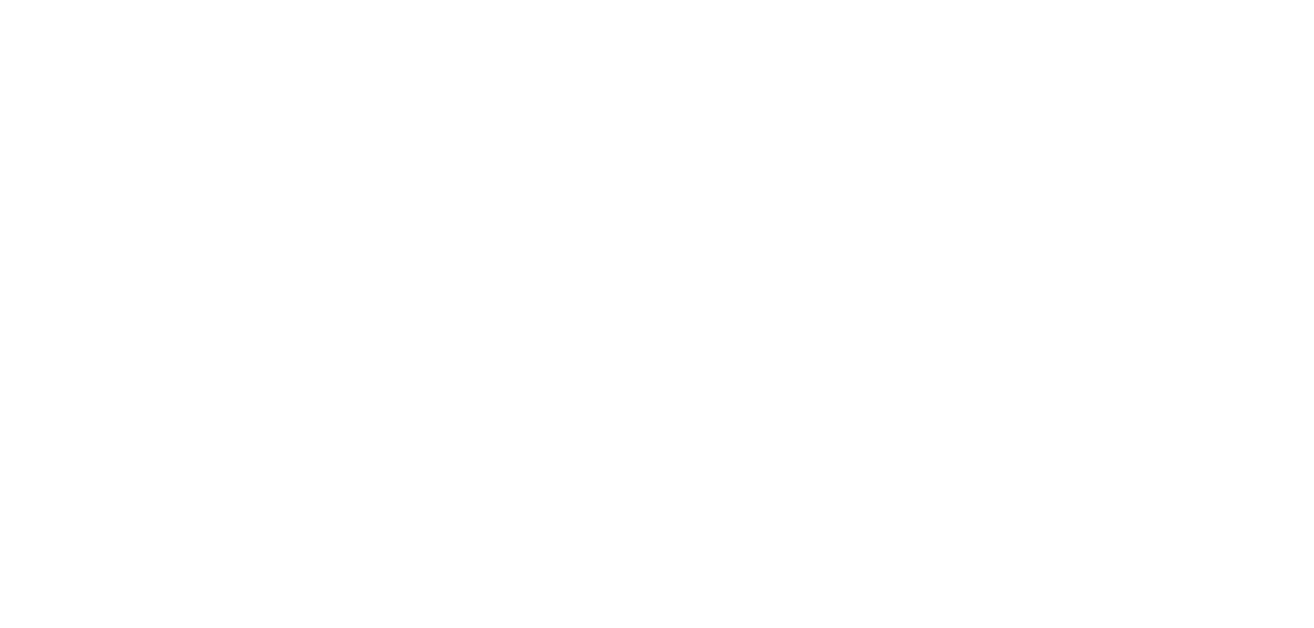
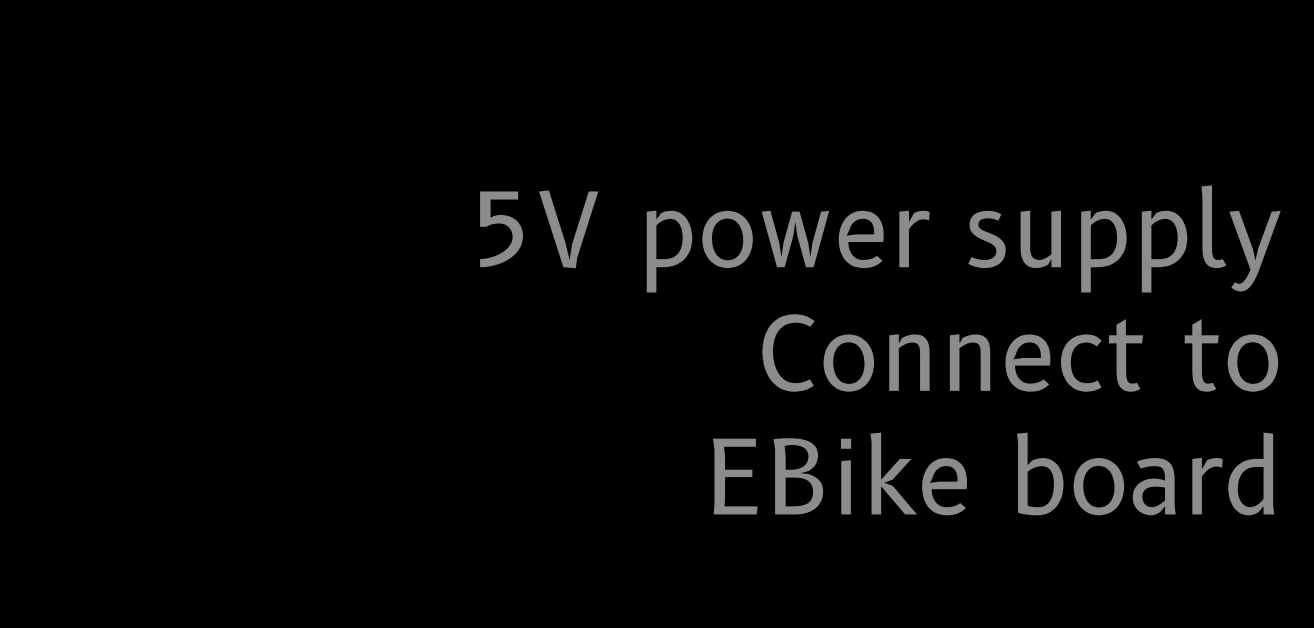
text: none -> 5V power supply (880, 238)
text: none -> Connect to (1020, 352)
text: none -> EBike board (993, 473)

